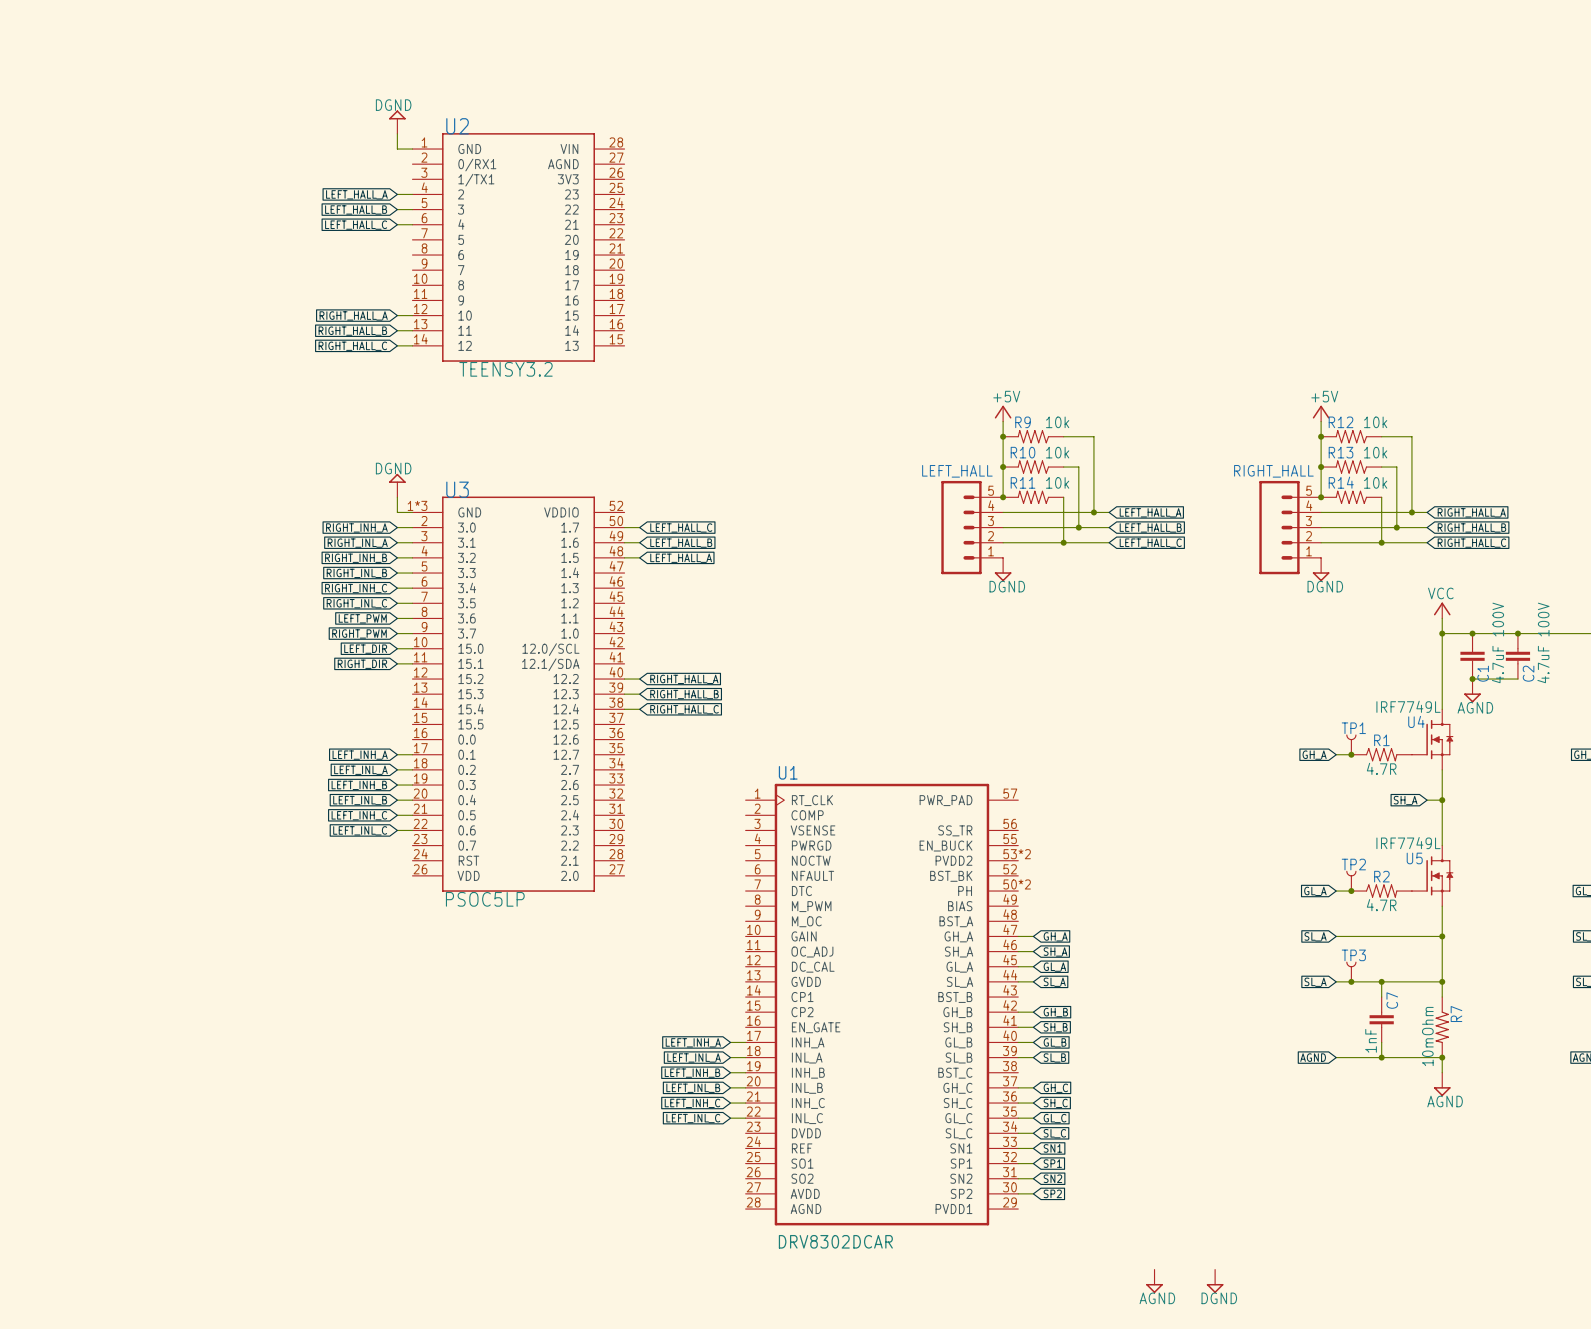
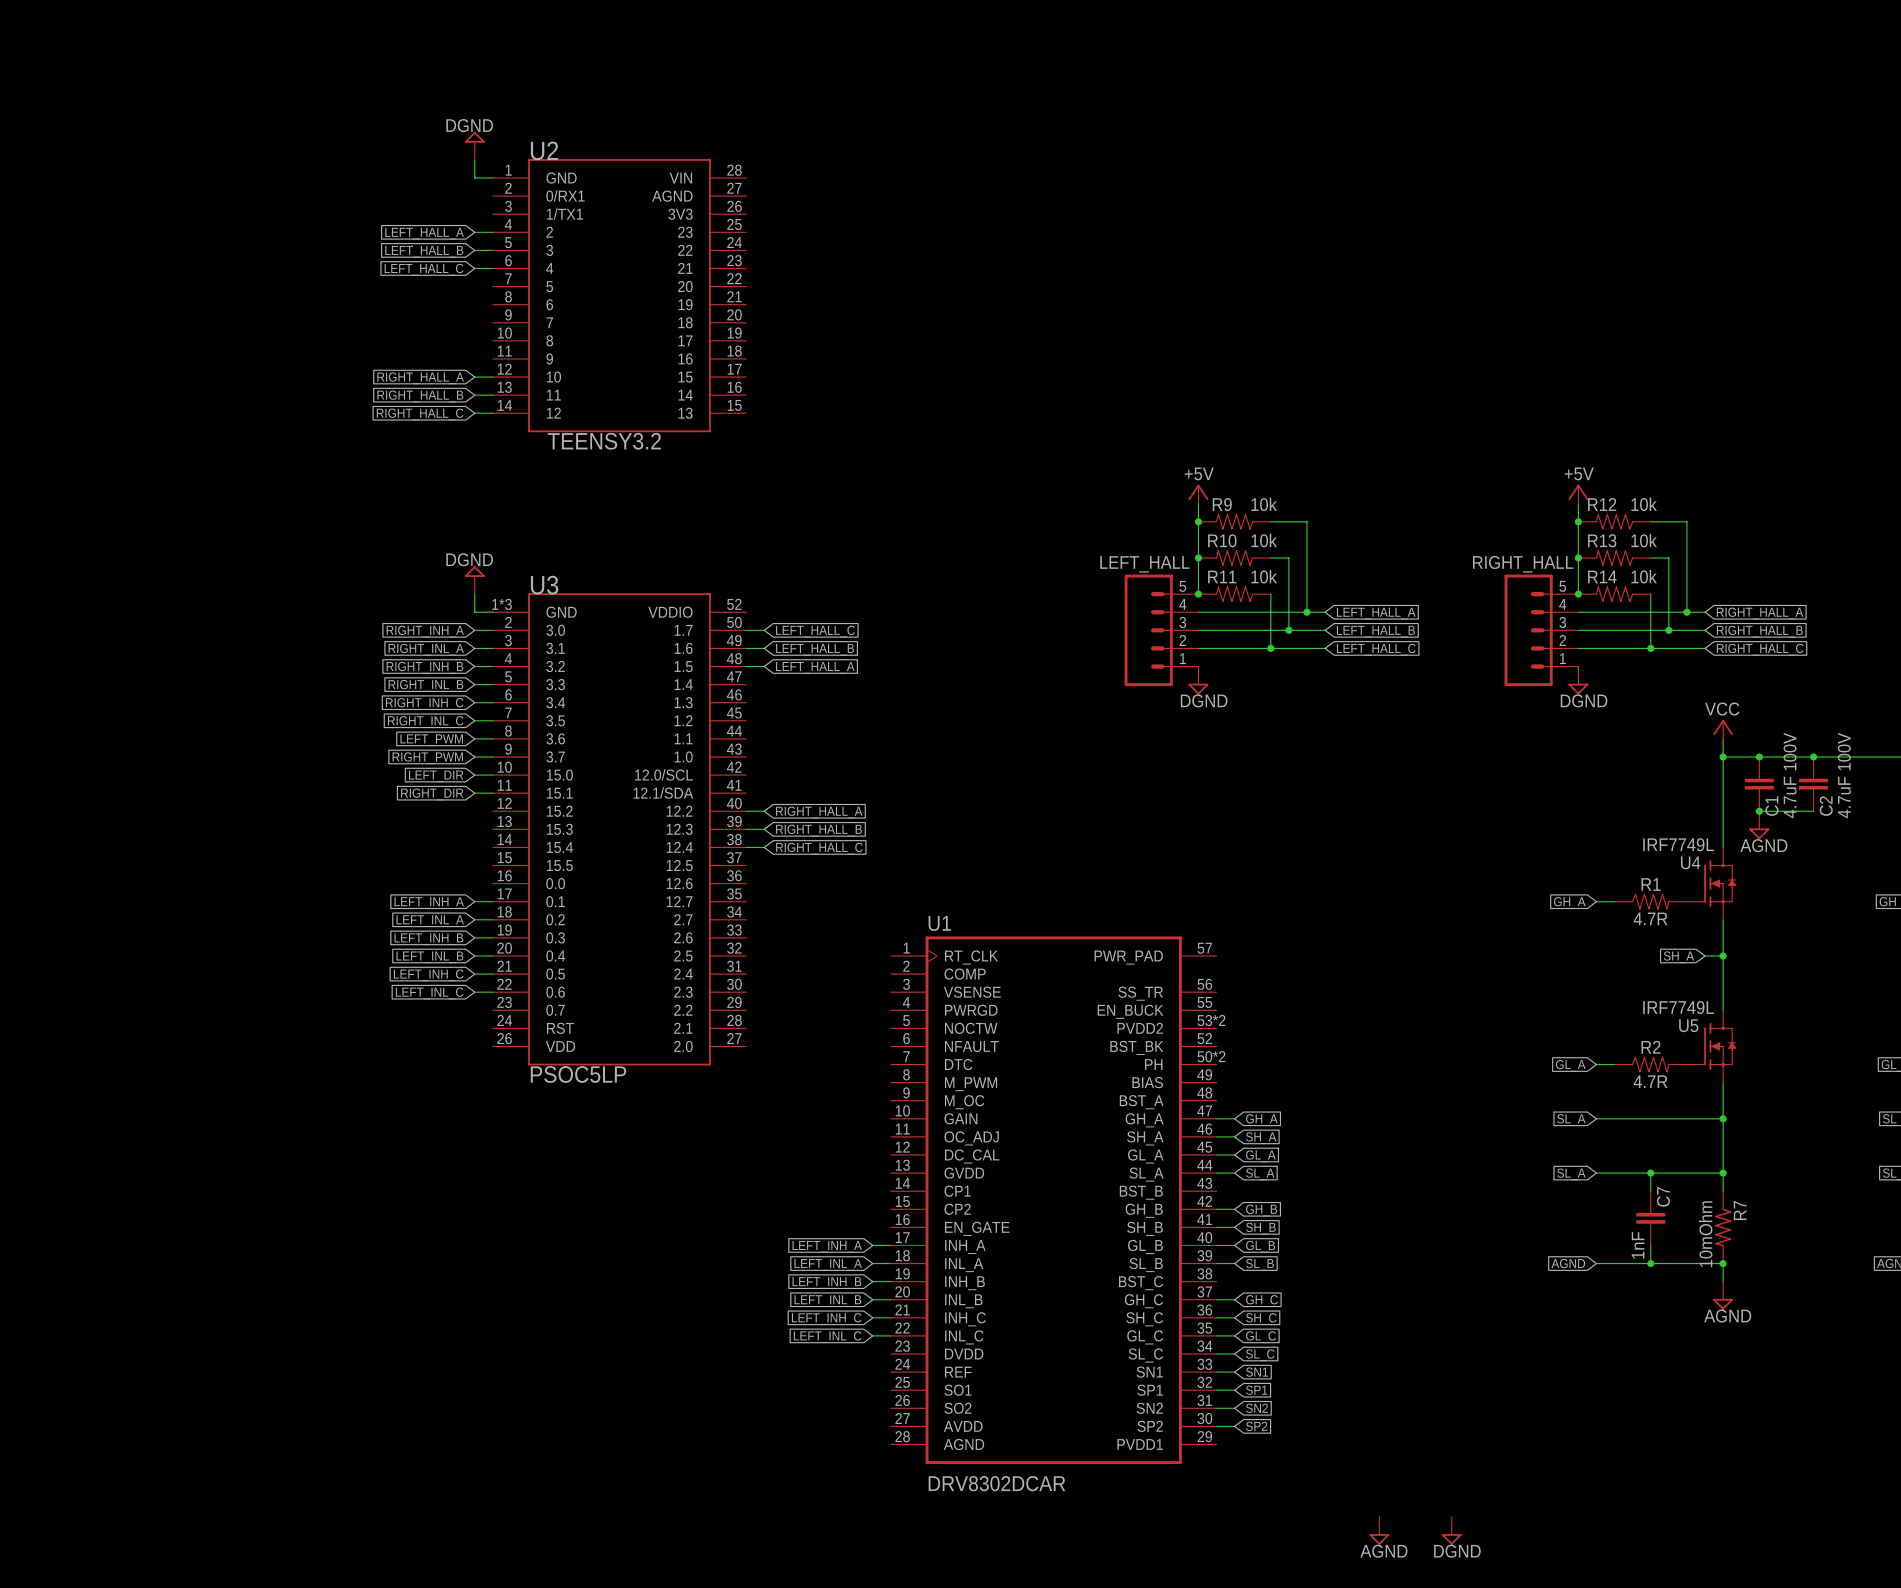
TP1: (1351, 744) -> none
junction: (1351, 754) -> none
TP2: (1351, 881) -> none
junction: (1351, 891) -> none
TP3: (1351, 972) -> none
junction: (1351, 981) -> none

